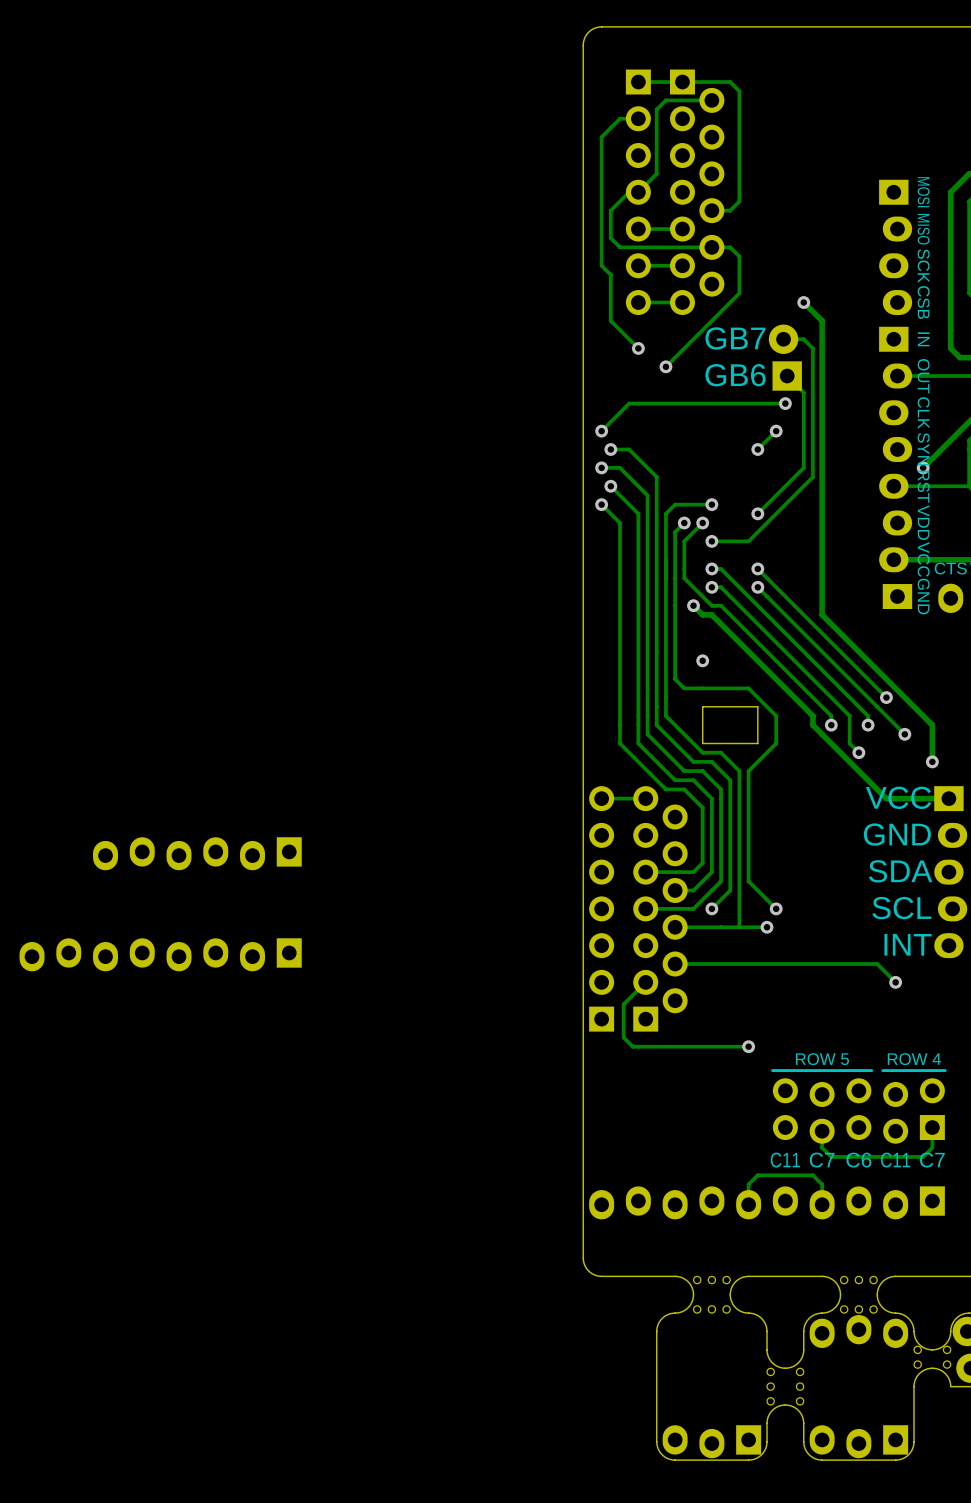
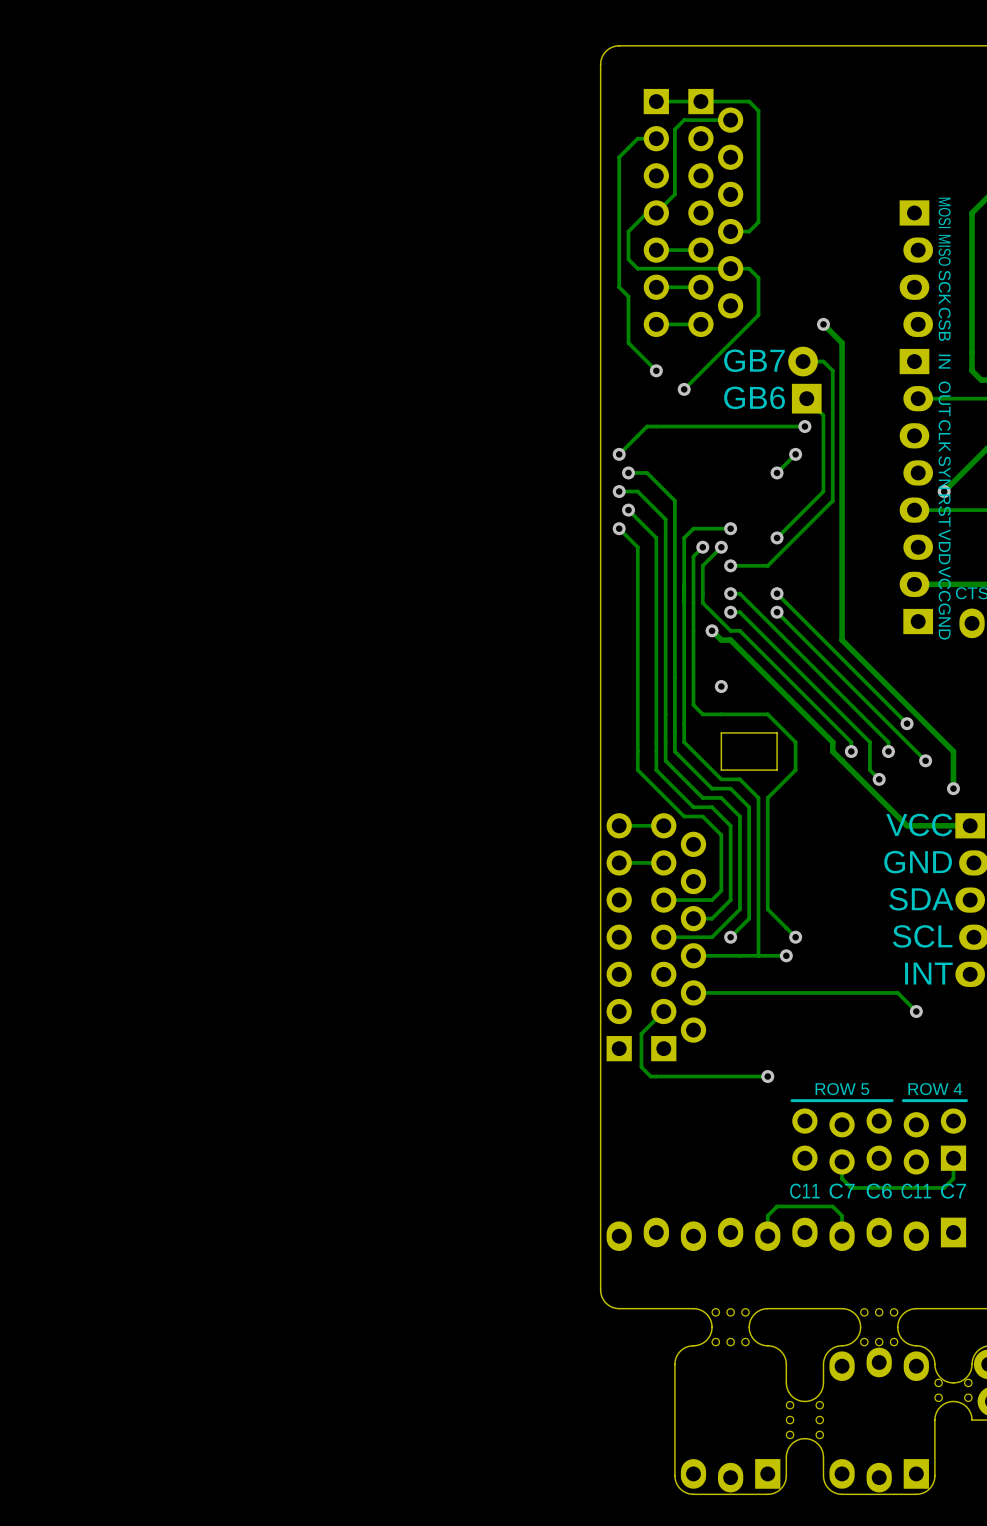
track: none -> (663, 862) (619, 862)
part: (197, 853) -> none
part: (160, 954) -> none

